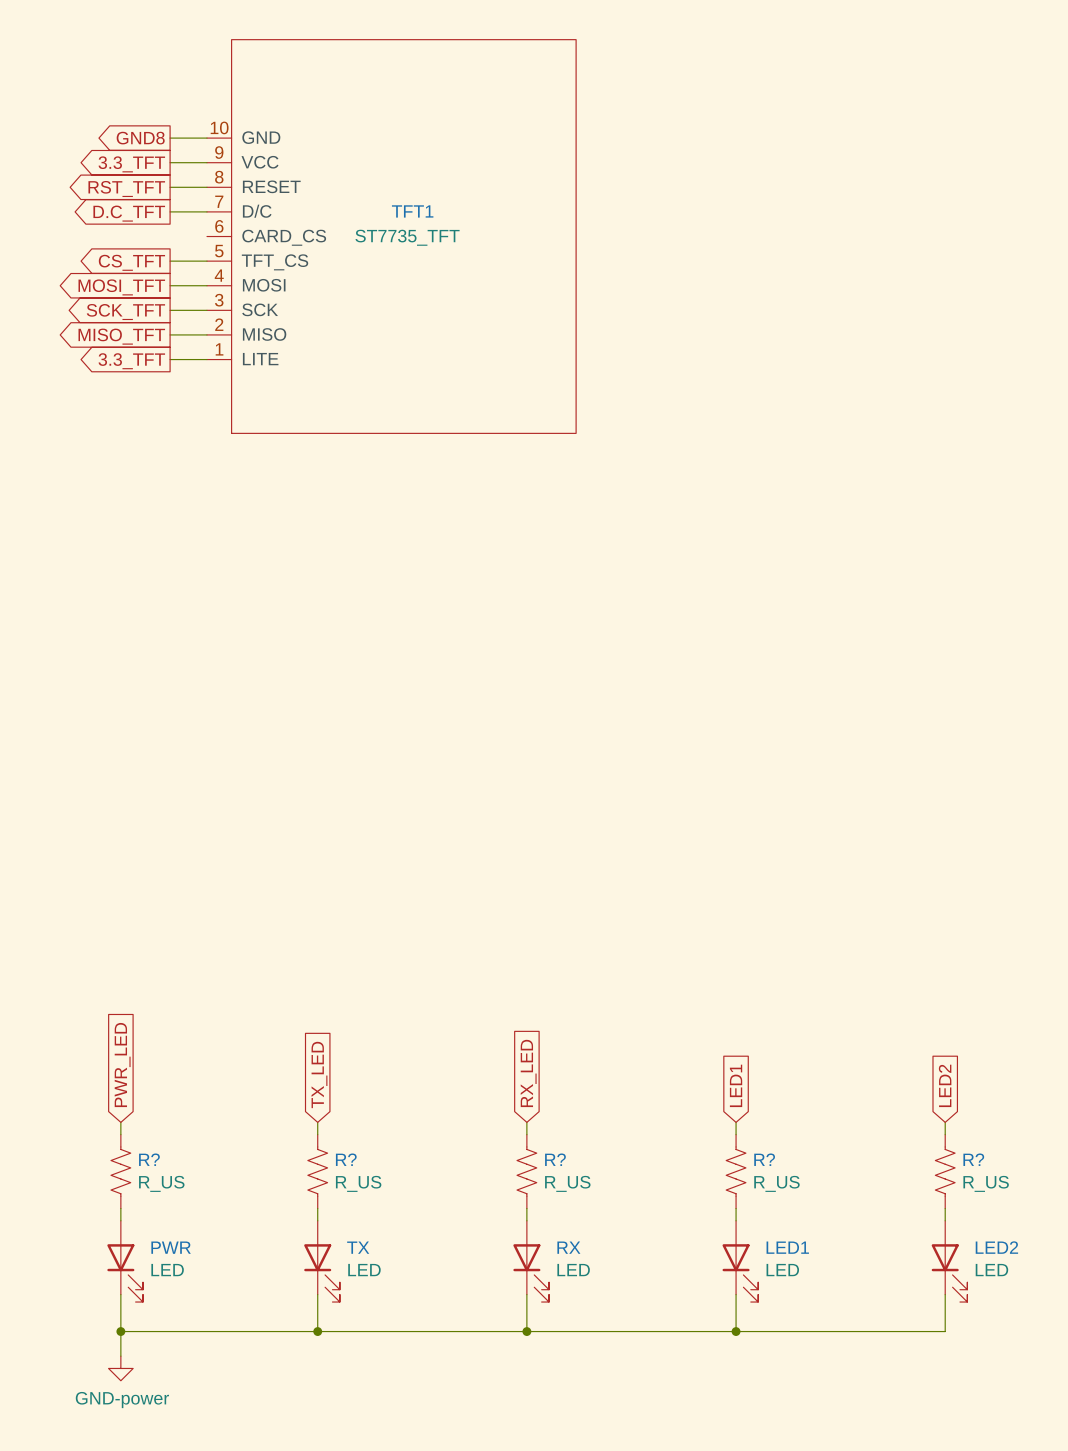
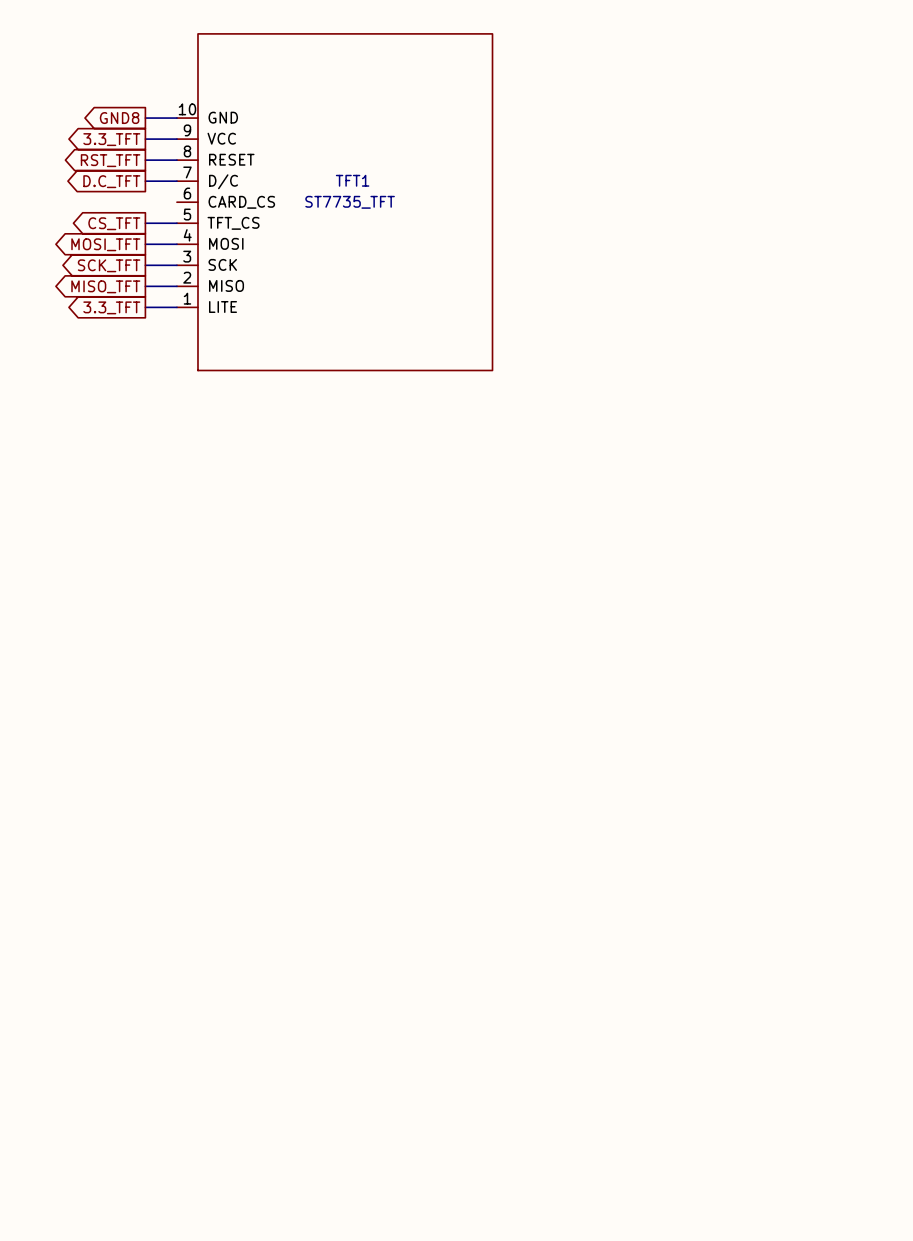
global label: PWR_LED (122, 1065) -> none
global label: RX_LED (528, 1073) -> none
global label: TX_LED (319, 1074) -> none
global label: LED1 (736, 1085) -> none
global label: LED2 (945, 1085) -> none
wire: (120, 1122) (120, 1134) -> none
wire: (317, 1122) (317, 1134) -> none
wire: (526, 1122) (526, 1134) -> none
wire: (736, 1122) (736, 1134) -> none
wire: (945, 1122) (945, 1134) -> none
R?: R_US (120, 1171) -> none
R?: R_US (317, 1171) -> none
R?: R_US (526, 1171) -> none
R?: R_US (736, 1171) -> none
R?: R_US (945, 1171) -> none
wire: (120, 1208) (120, 1220) -> none
wire: (317, 1208) (317, 1220) -> none
wire: (526, 1208) (526, 1220) -> none
wire: (736, 1208) (736, 1220) -> none
wire: (945, 1208) (945, 1220) -> none
PWR: LED (125, 1261) -> none
TX: LED (322, 1261) -> none
RX: LED (531, 1261) -> none
LED1: LED (740, 1261) -> none
LED2: LED (949, 1261) -> none
wire: (120, 1294) (120, 1356) -> none
wire: (317, 1294) (317, 1331) -> none
wire: (526, 1294) (526, 1331) -> none
wire: (736, 1294) (736, 1331) -> none
wire: (945, 1294) (945, 1331) (120, 1331) -> none
junction: (120, 1331) -> none
junction: (317, 1331) -> none
junction: (526, 1331) -> none
junction: (736, 1331) -> none
power symbol: GND-power (120, 1368) -> none

